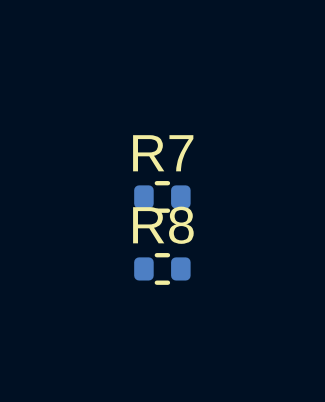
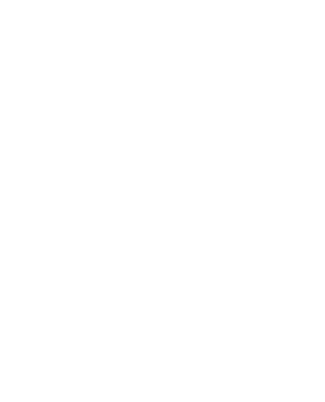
R7: (162, 196) -> none
R8: (162, 268) -> none

